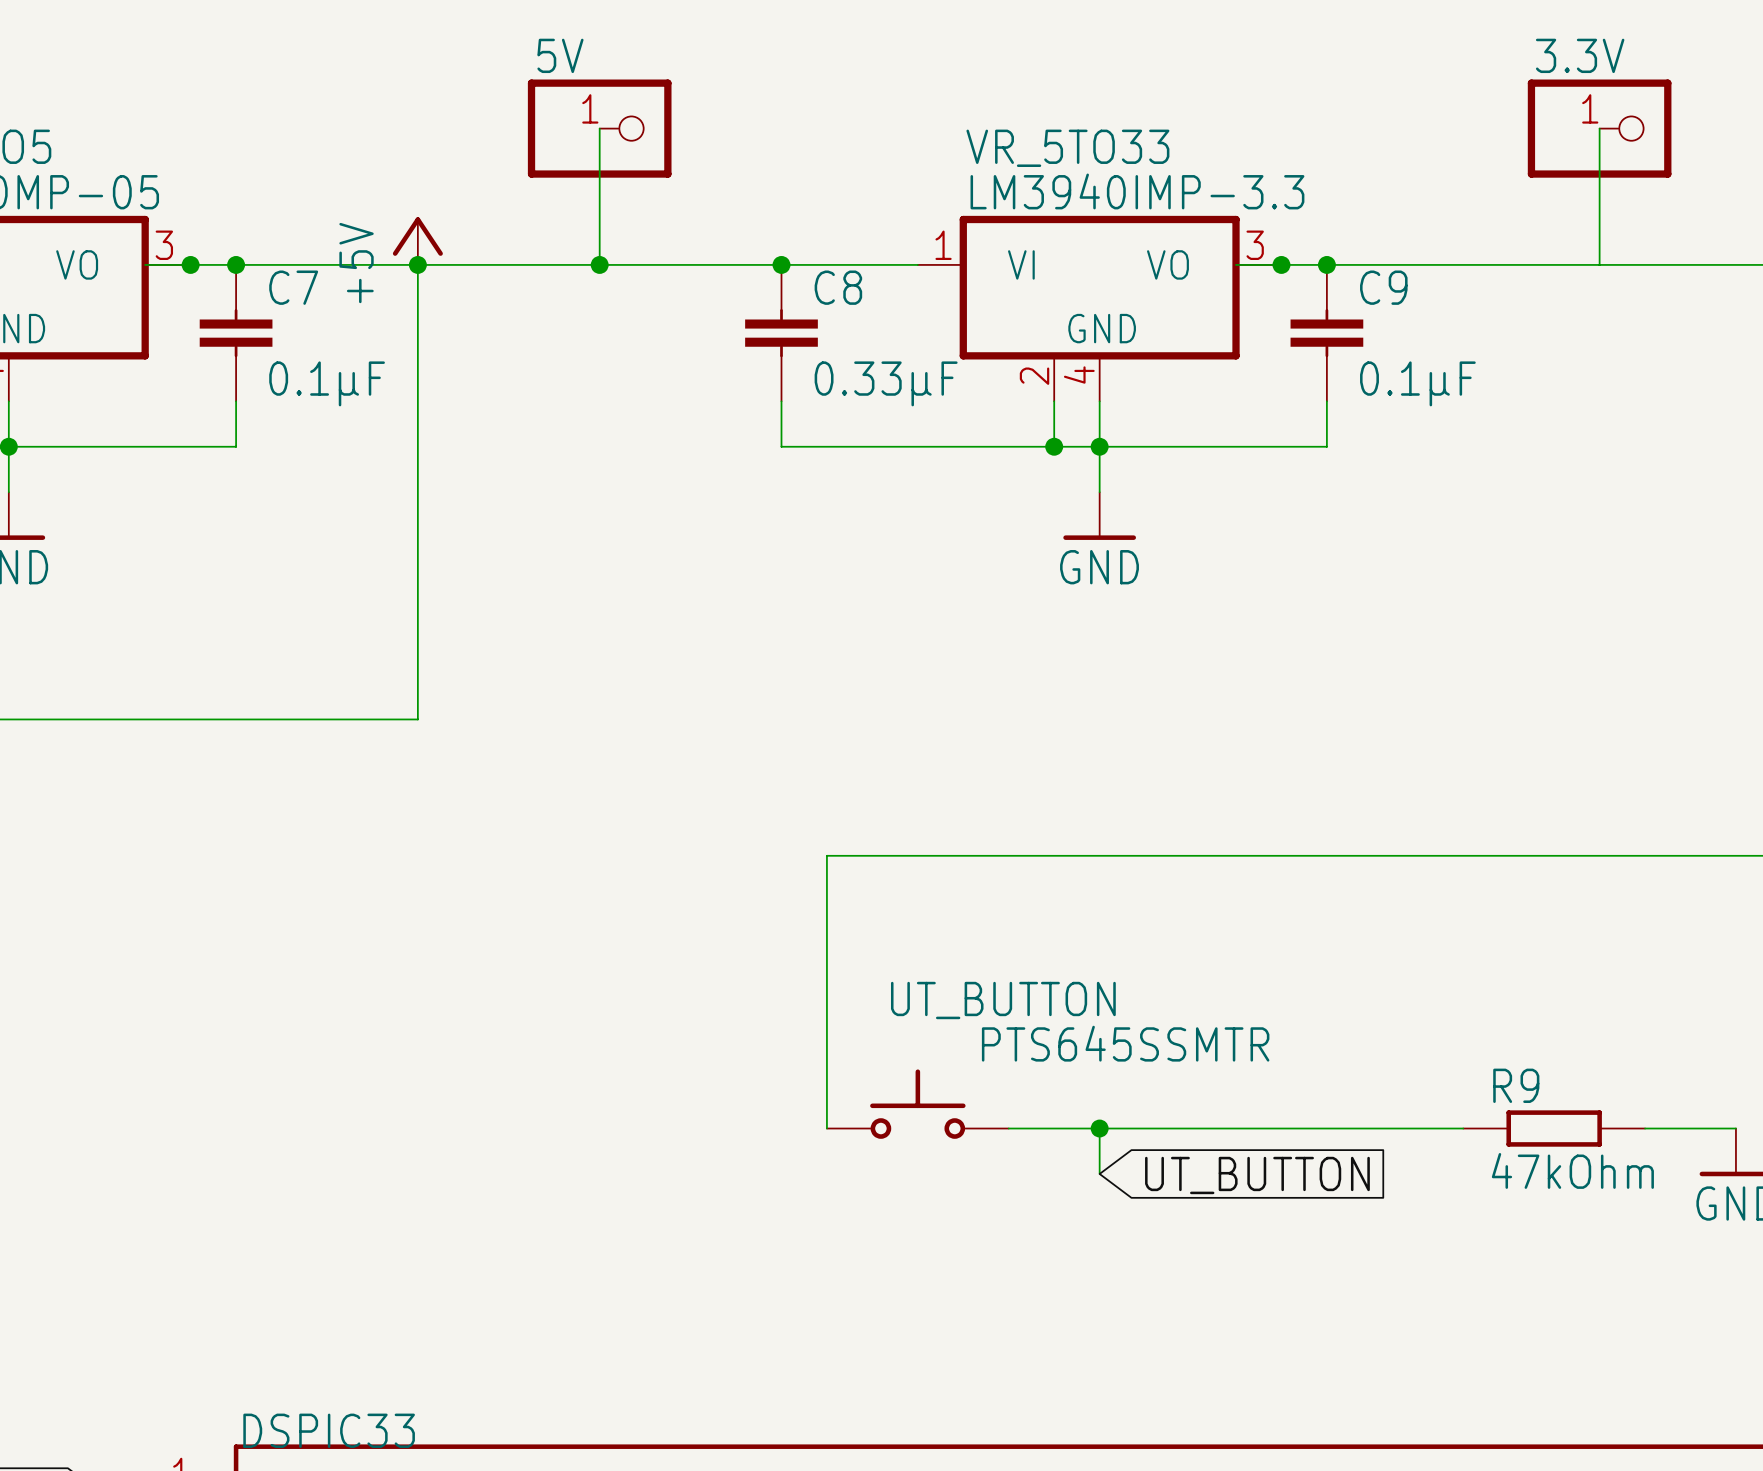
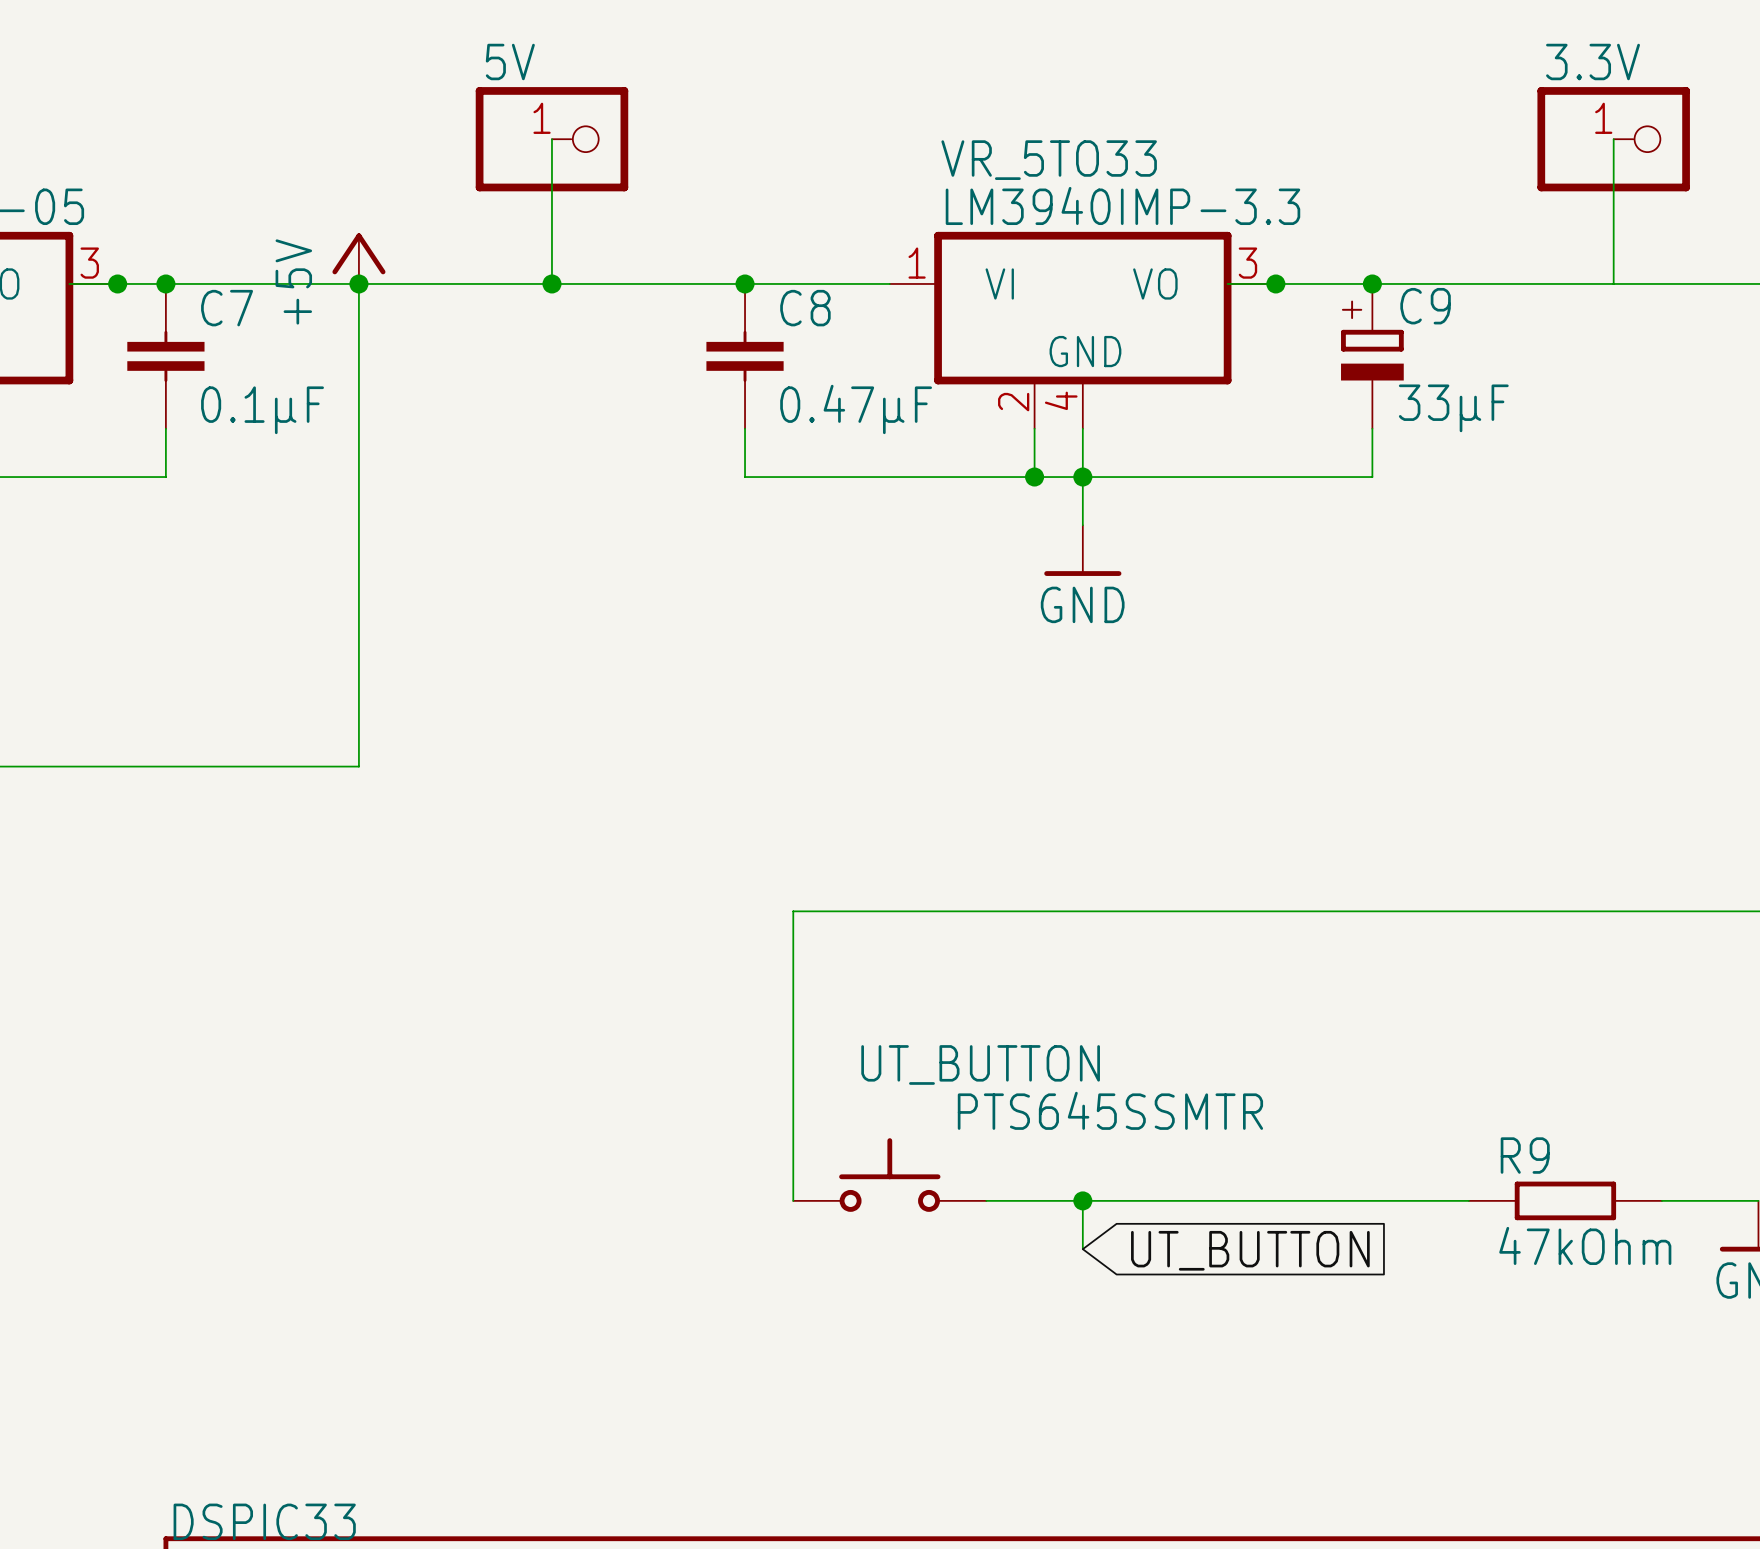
C9 symbol: [1290, 264, 1364, 402] -> [1341, 283, 1404, 429]
junction position: (1326, 264) -> (1372, 283)
C8 value: 0.33µF (886, 383) -> 0.47µF (856, 409)
C9 value: 0.1µF (1417, 383) -> 33µF (1453, 408)
wire: (1326, 401) (1326, 446) -> (1372, 428) (1372, 477) (1324, 477)

